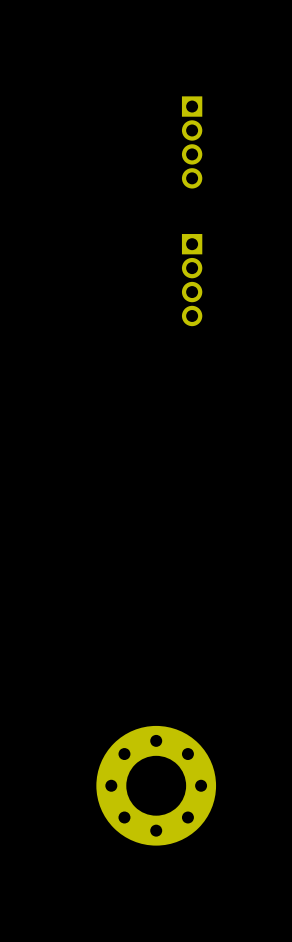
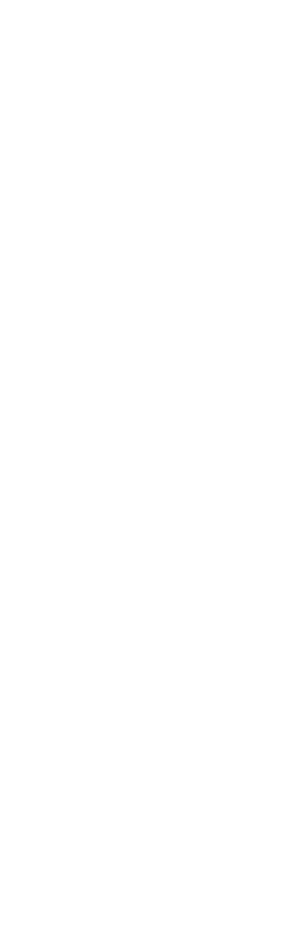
part: (192, 142) -> none
part: (192, 280) -> none
part: (156, 785) -> none

